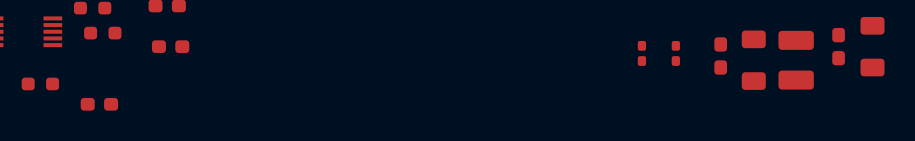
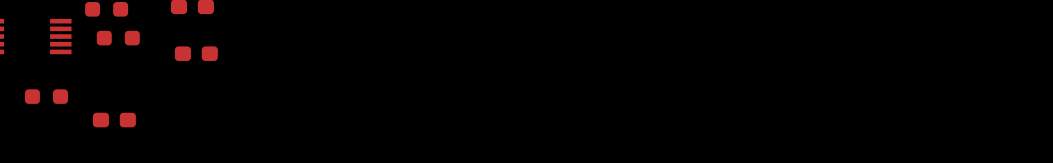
part: (838, 46) -> none
part: (872, 46) -> none
part: (641, 53) -> none
part: (675, 53) -> none
part: (720, 55) -> none
part: (753, 60) -> none
part: (796, 60) -> none

